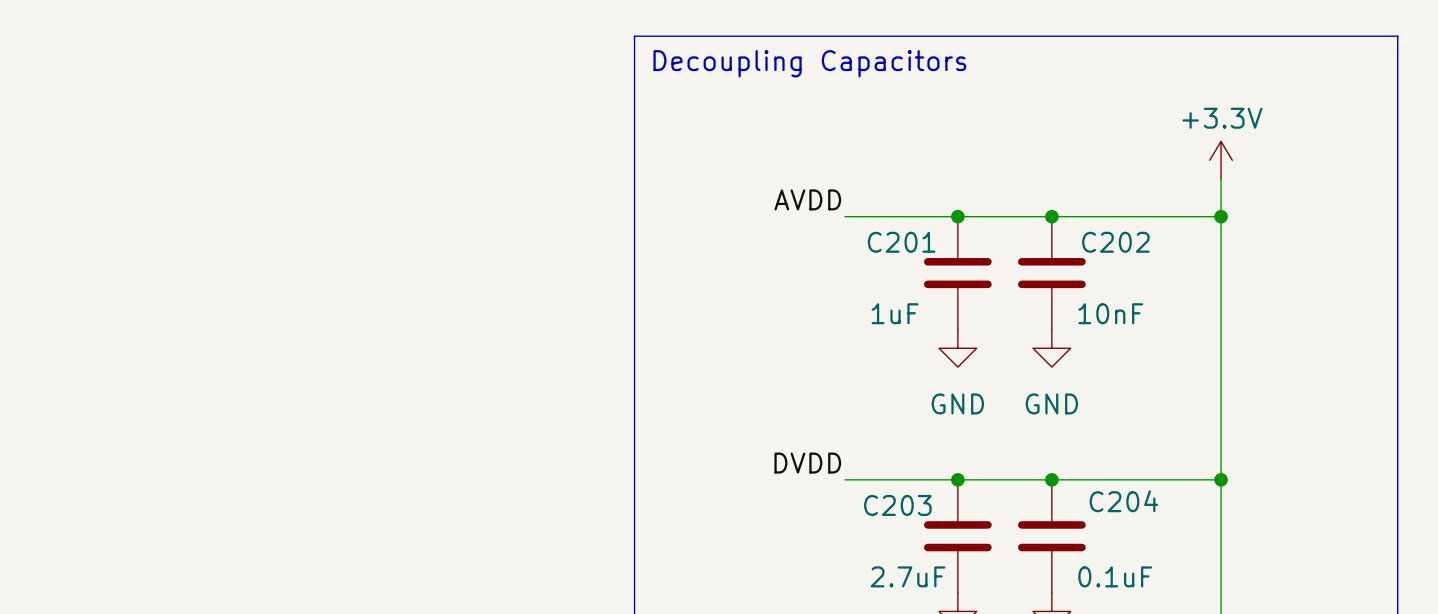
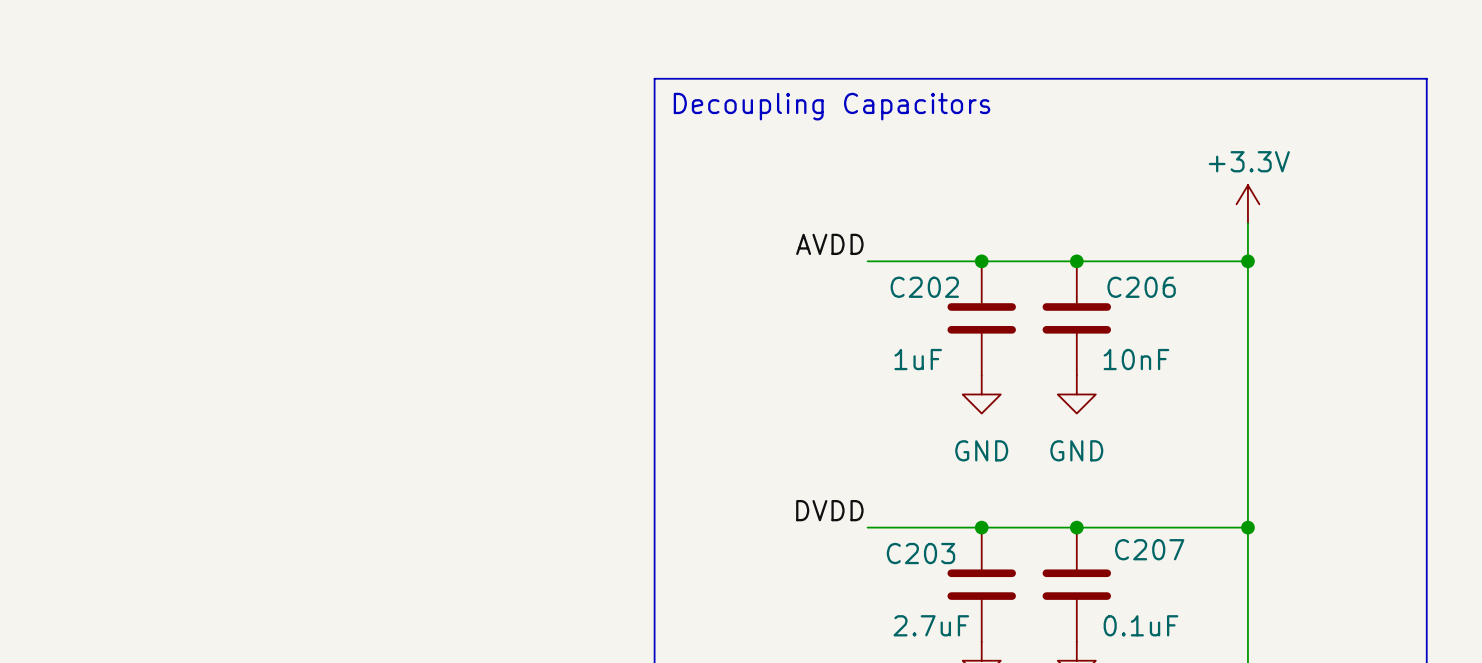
C201 name: C201 (901, 242) -> C202 (924, 287)
C202 name: C202 (1115, 242) -> C206 (1141, 287)
C204 name: C204 (1123, 501) -> C207 (1149, 549)

